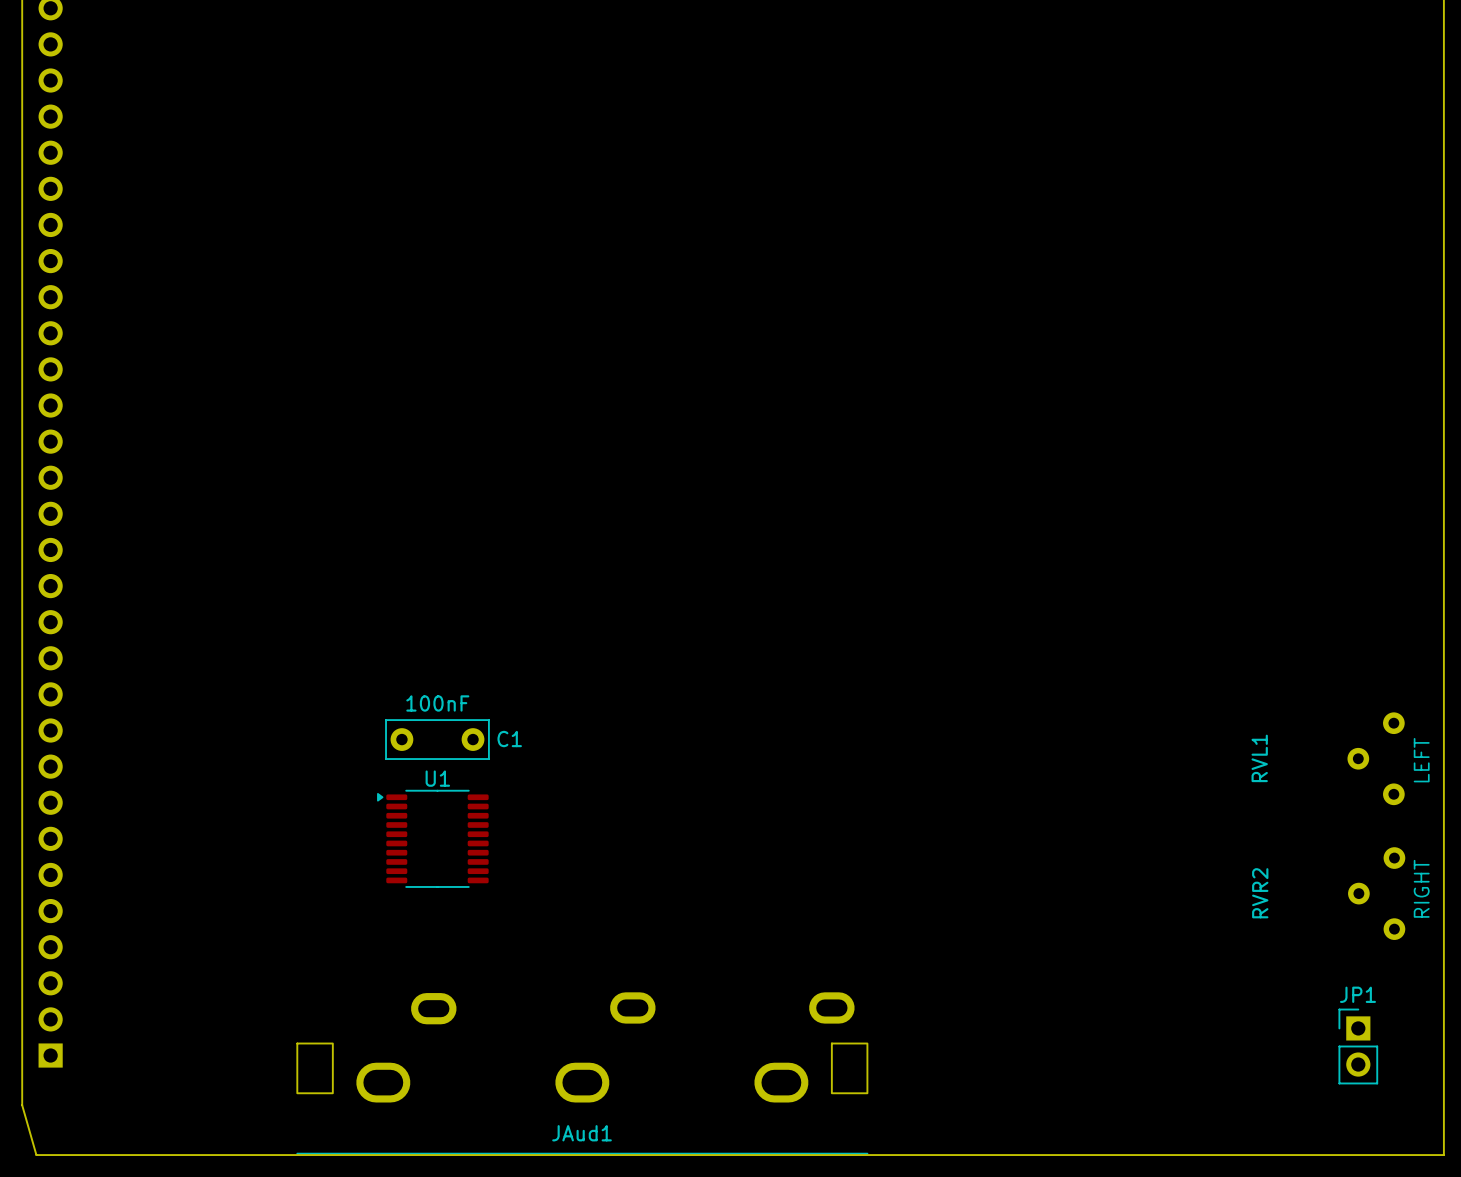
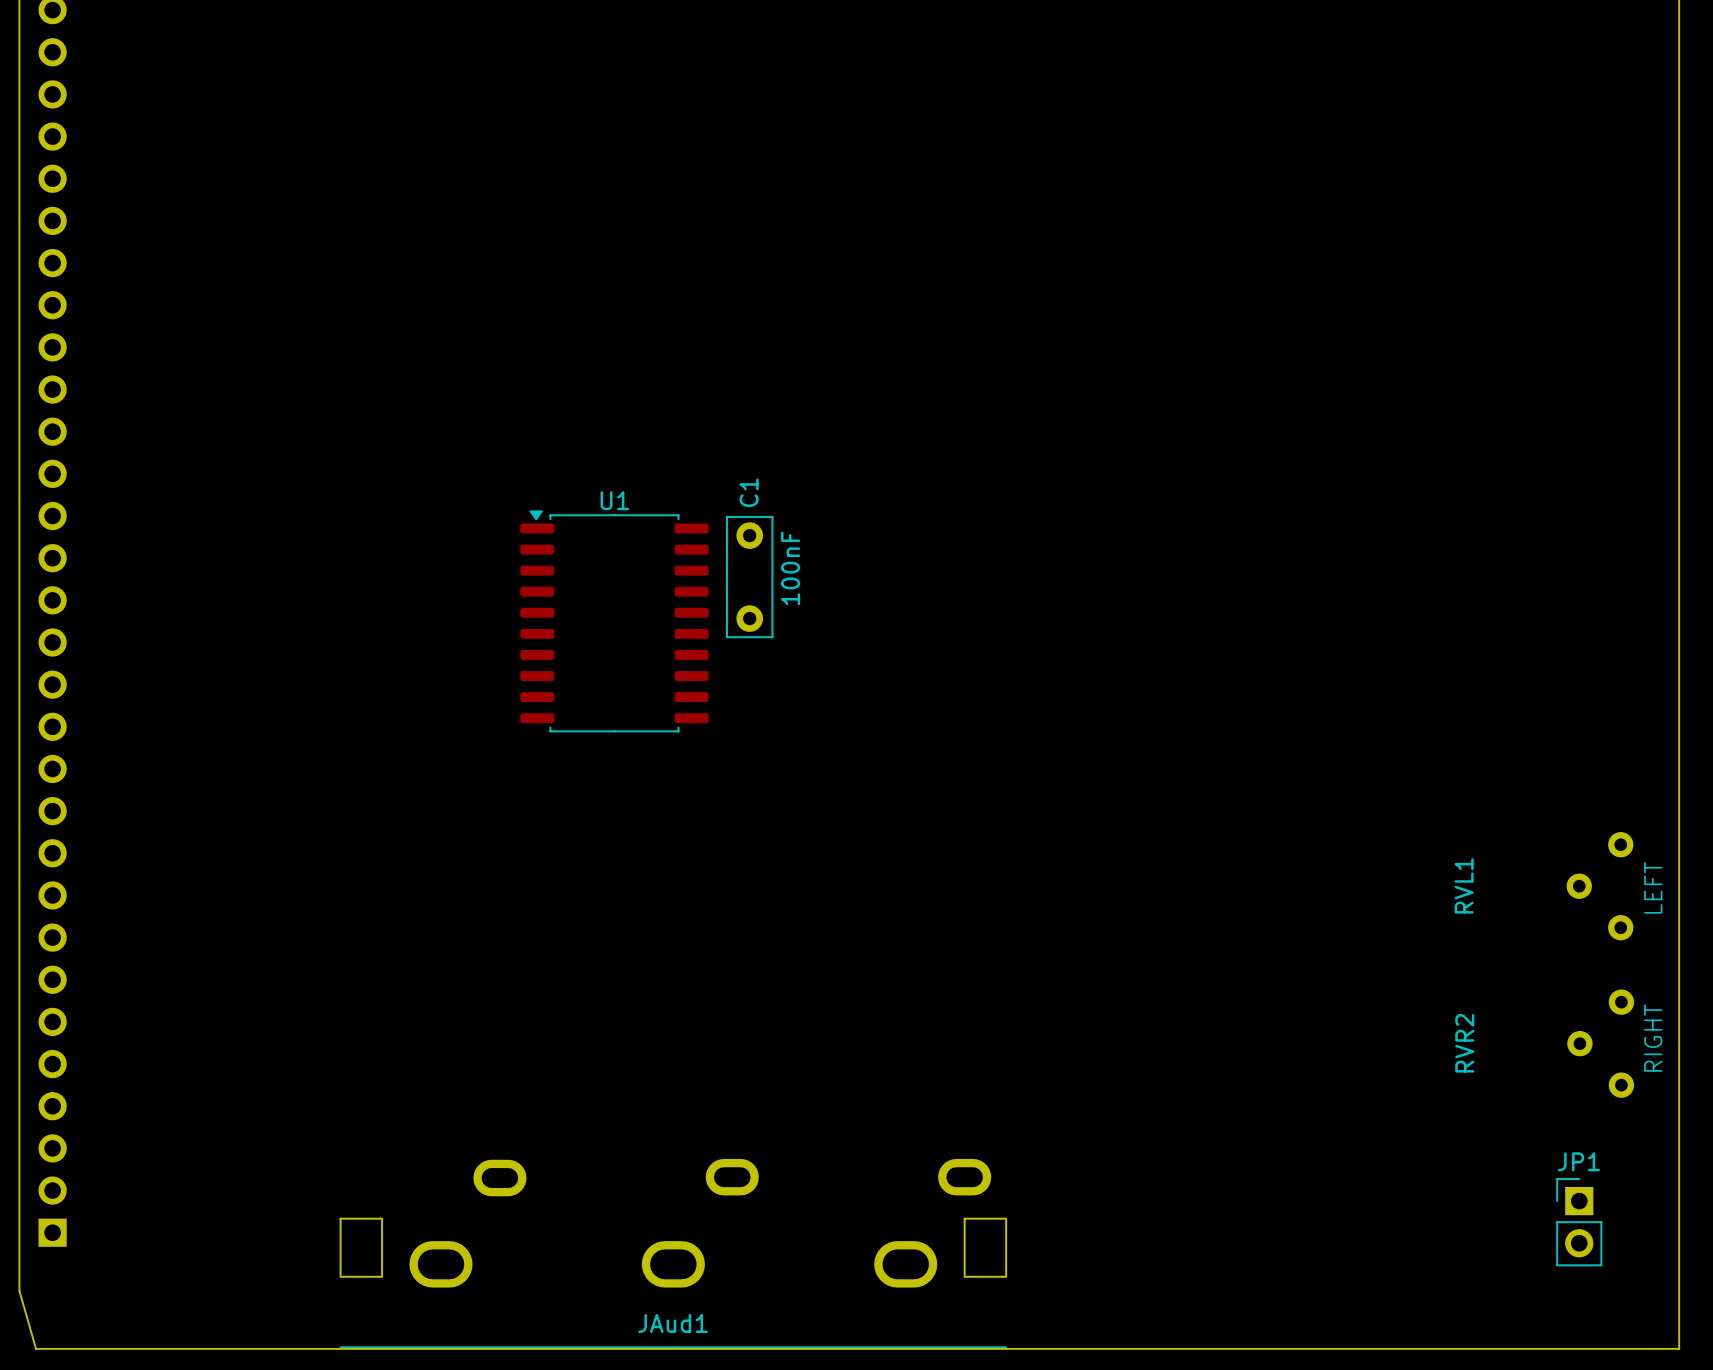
C1 rotation: 0° (437, 739) -> 90° clockwise (749, 577)
C1 position: (437, 739) -> (749, 577)
C1 name position: C1 (509, 739) -> C1 (749, 492)
U1 name position: U1 (437, 778) -> U1 (614, 500)
U1 footprint: [377, 789, 489, 888] -> [520, 510, 709, 733]

